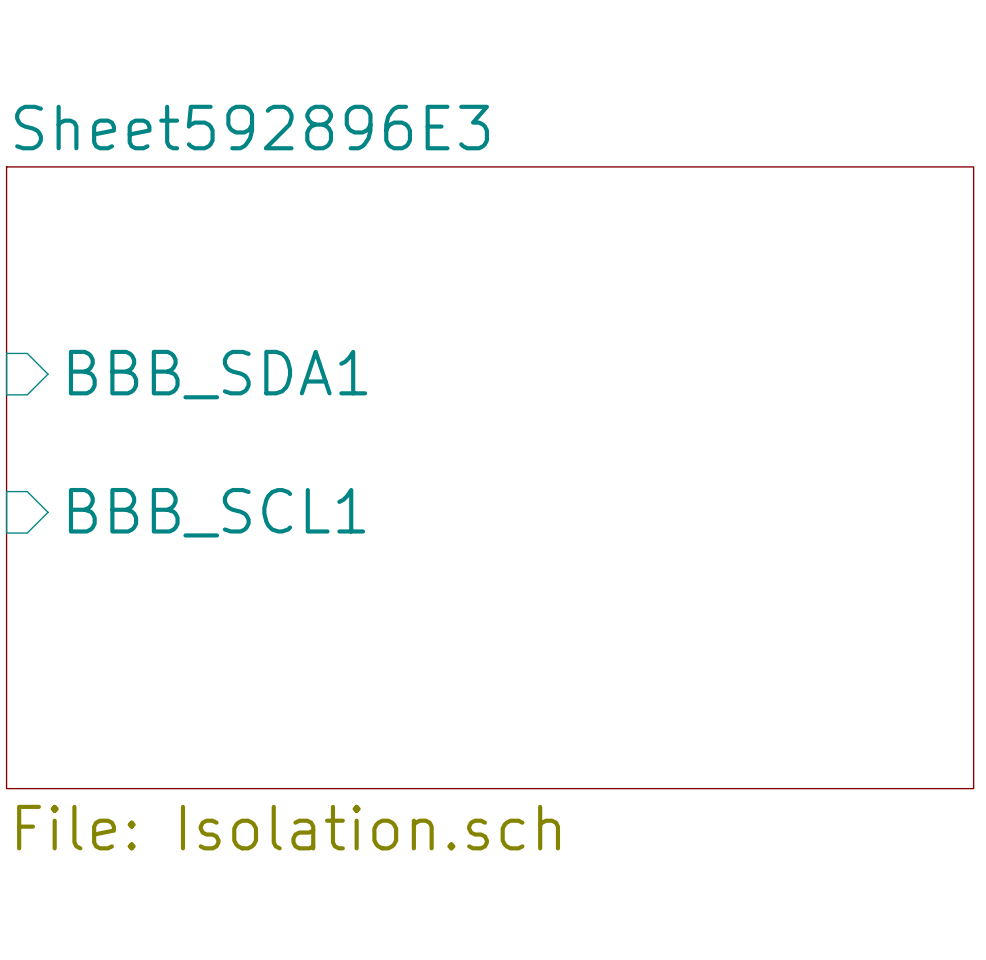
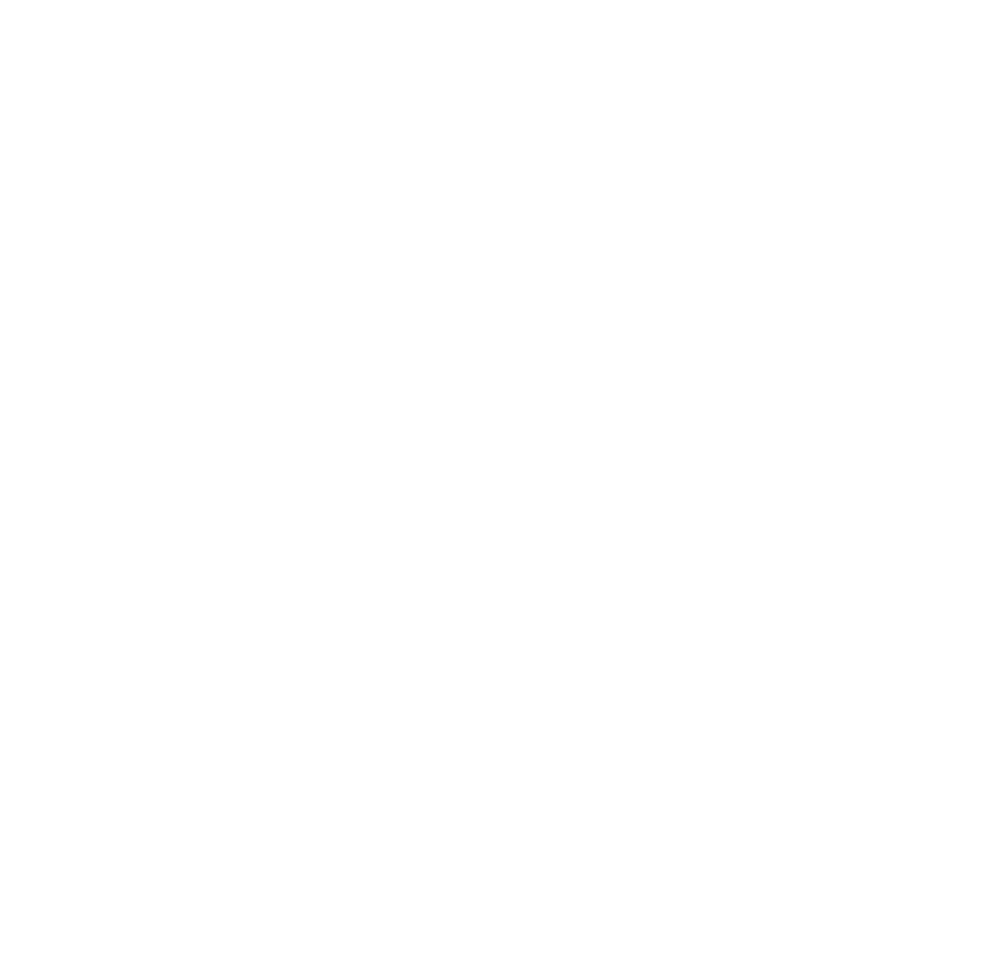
sheet pin: BBB_SDA1 (217, 374) -> none
sheet Sheet592896E3: File: Isolation.sch (490, 477) -> none
sheet pin: BBB_SCL1 (217, 512) -> none

